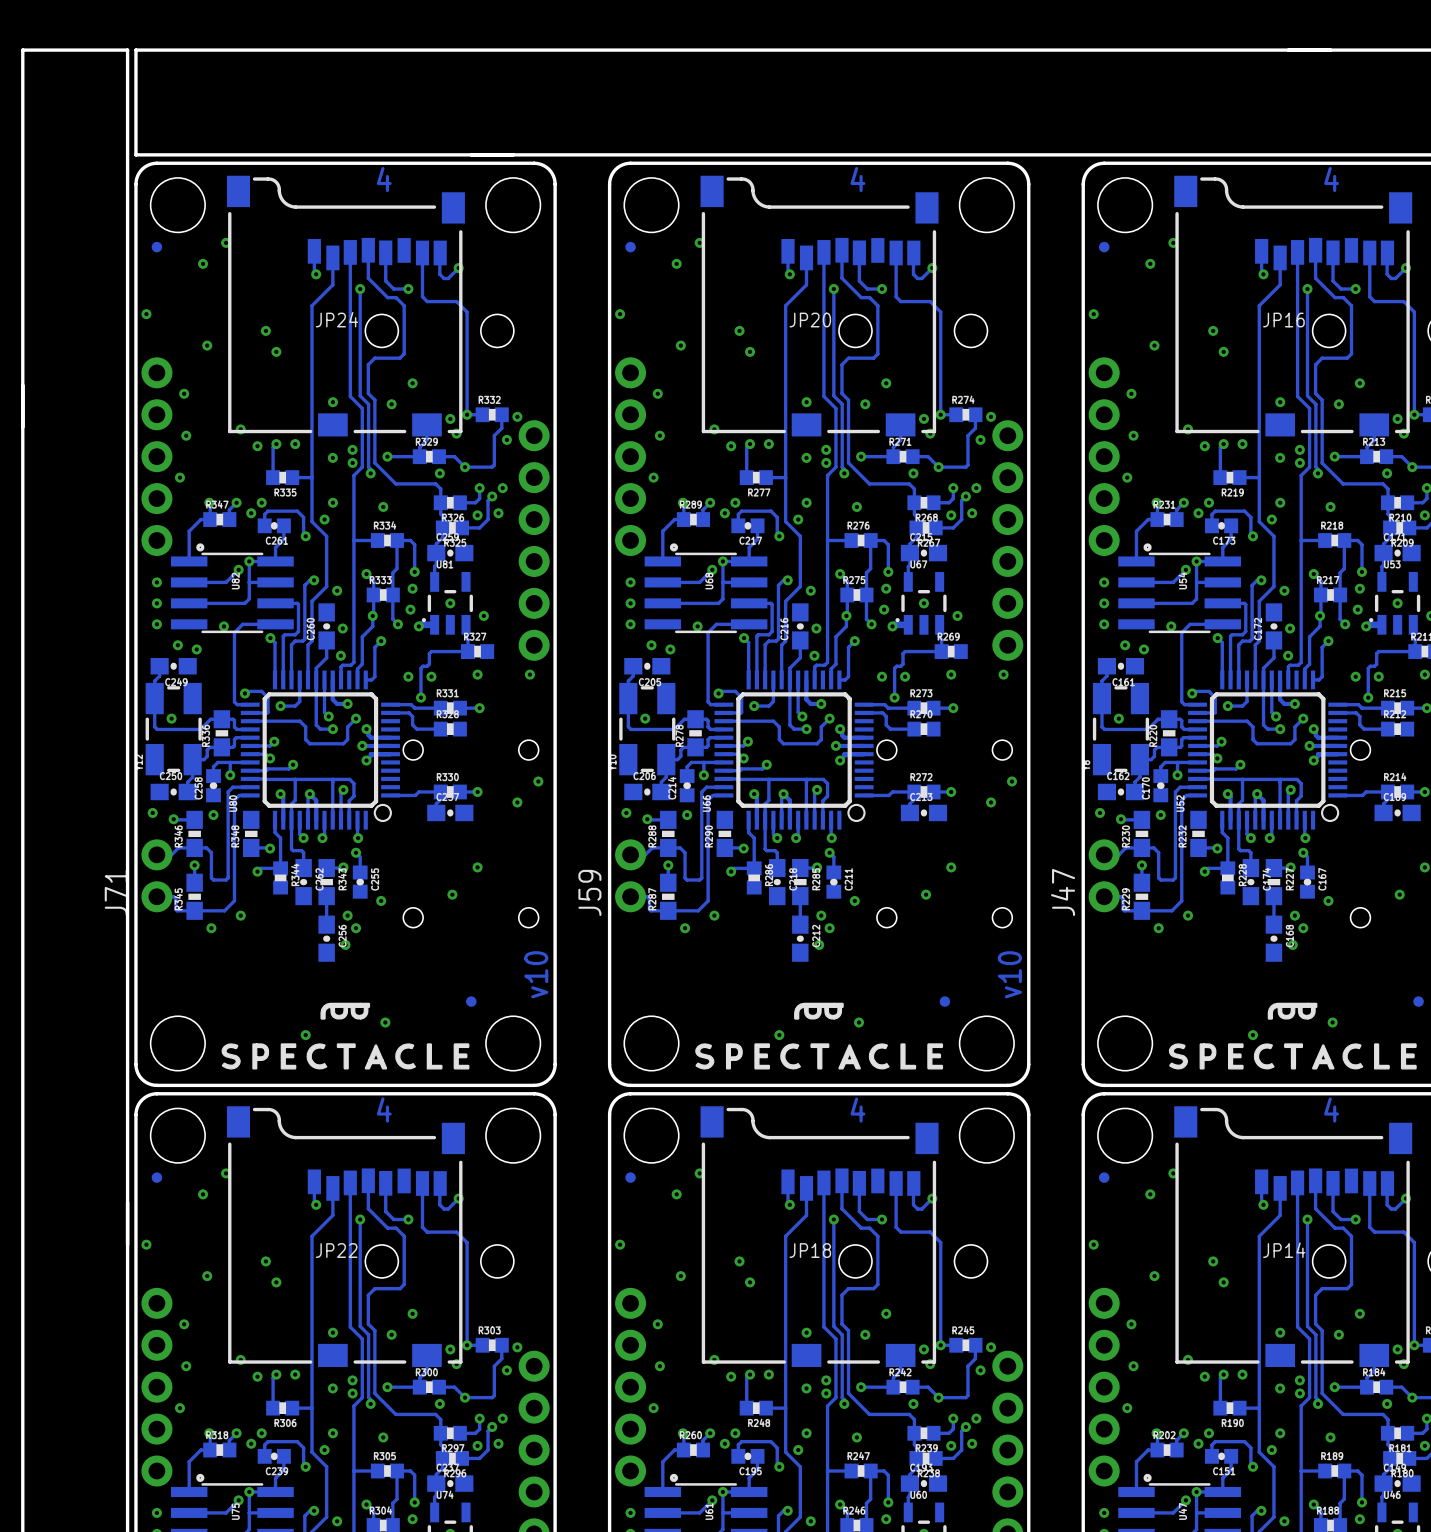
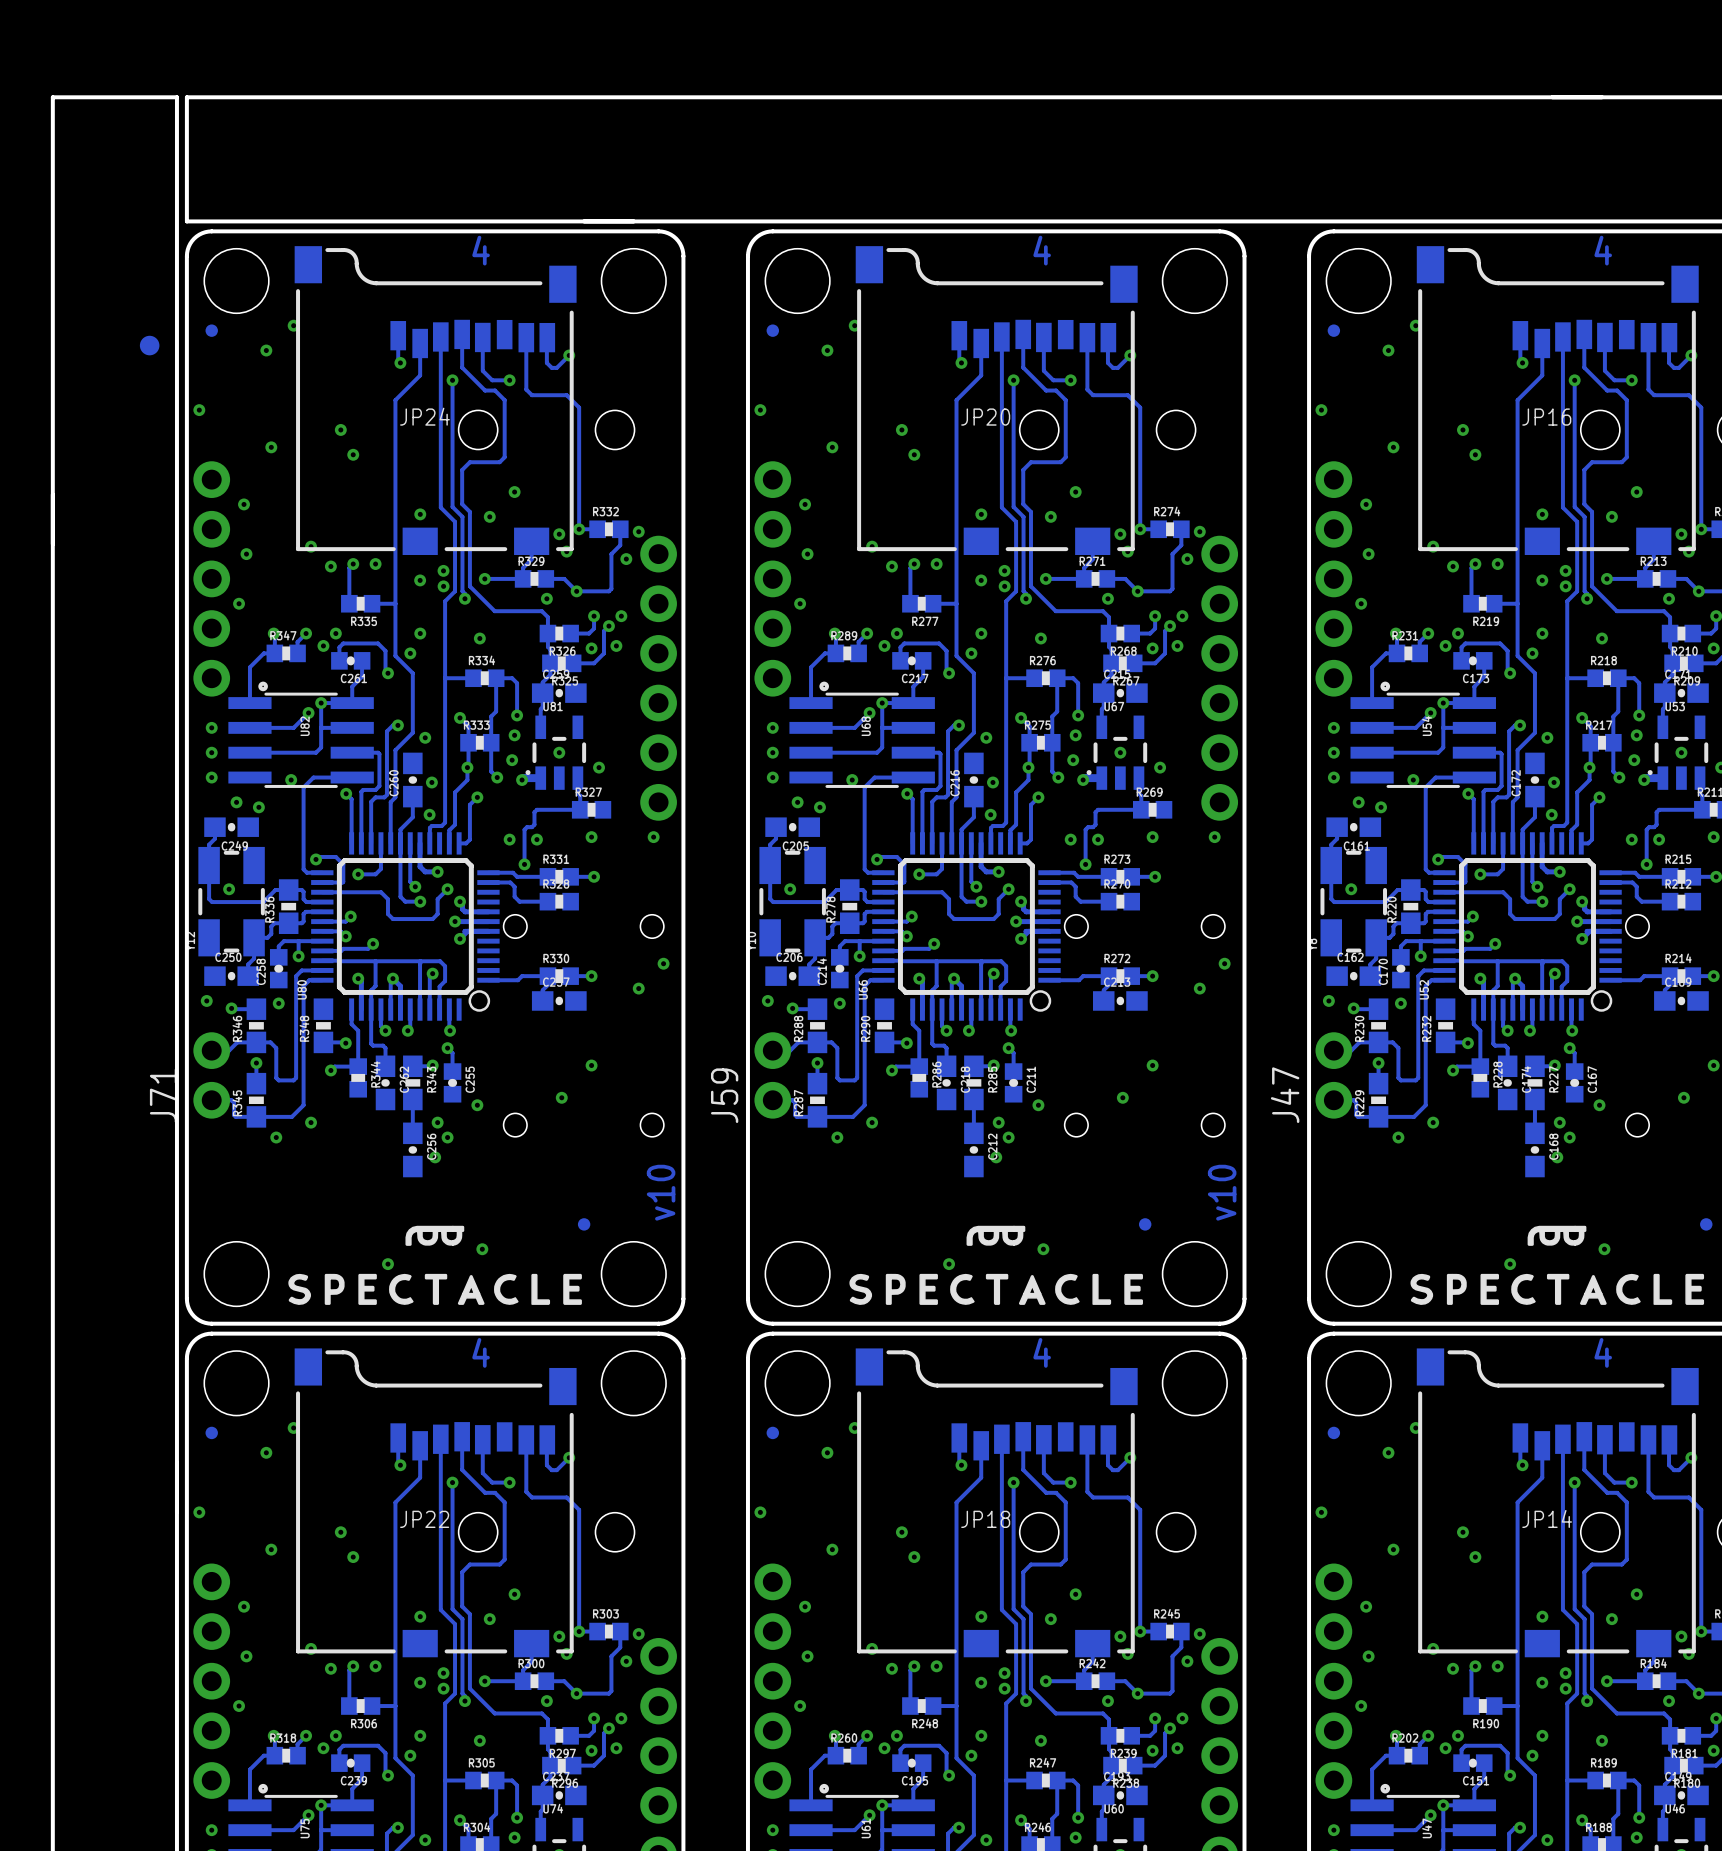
part: none -> (149, 345)

